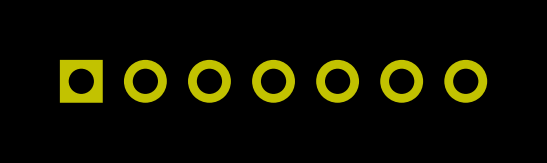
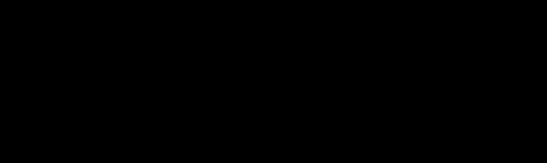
part: (273, 81) -> none

